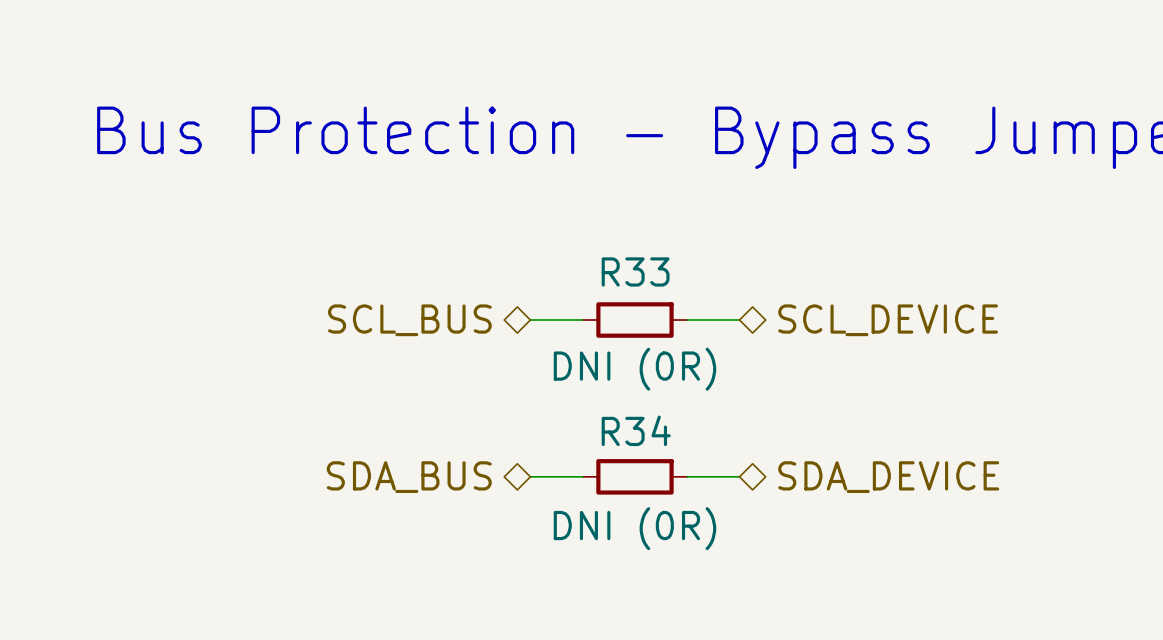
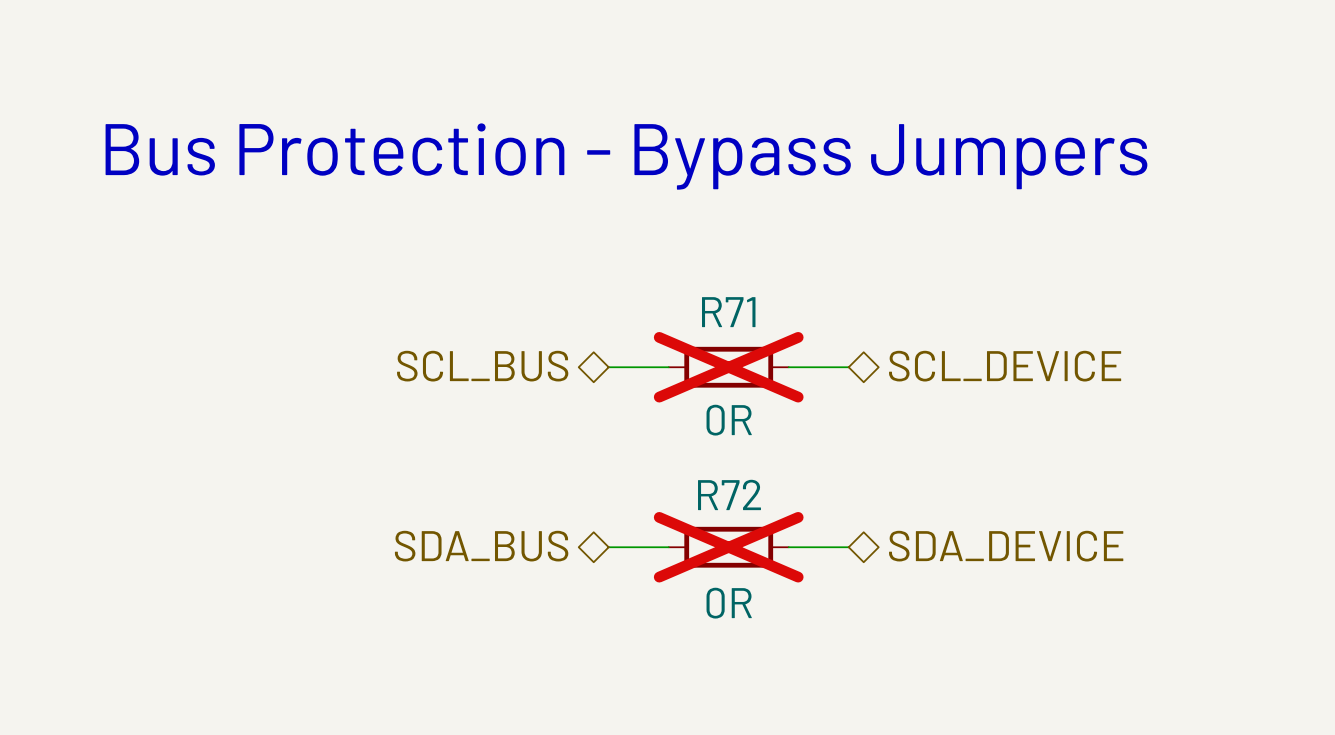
R33 name: R33 (635, 271) -> R71 (728, 312)
R33 do-not-place cross: none -> (728, 367)
R33 value: DNI (0R) (634, 369) -> 0R (729, 420)
R34 name: R34 (636, 430) -> R72 (729, 494)
R34 do-not-place cross: none -> (728, 547)
R34 value: DNI (0R) (634, 528) -> 0R (729, 603)

